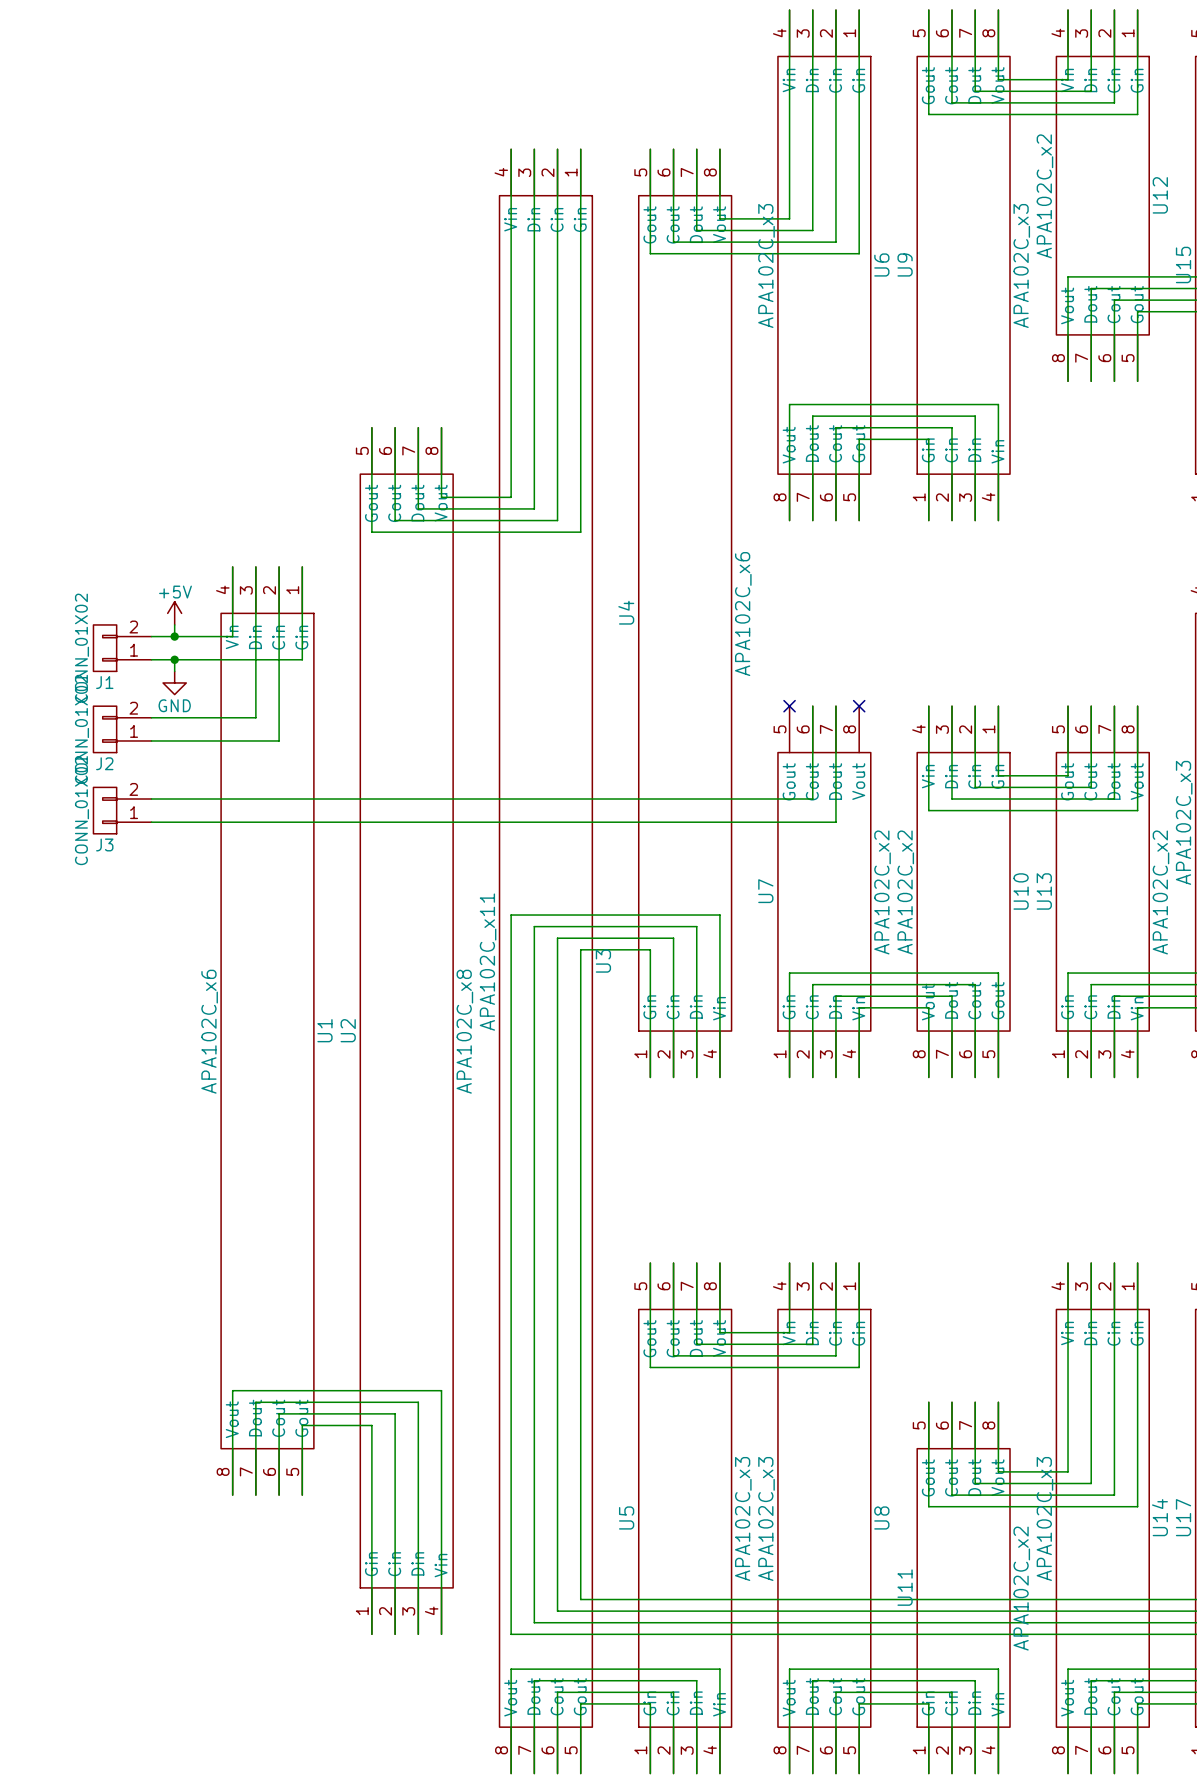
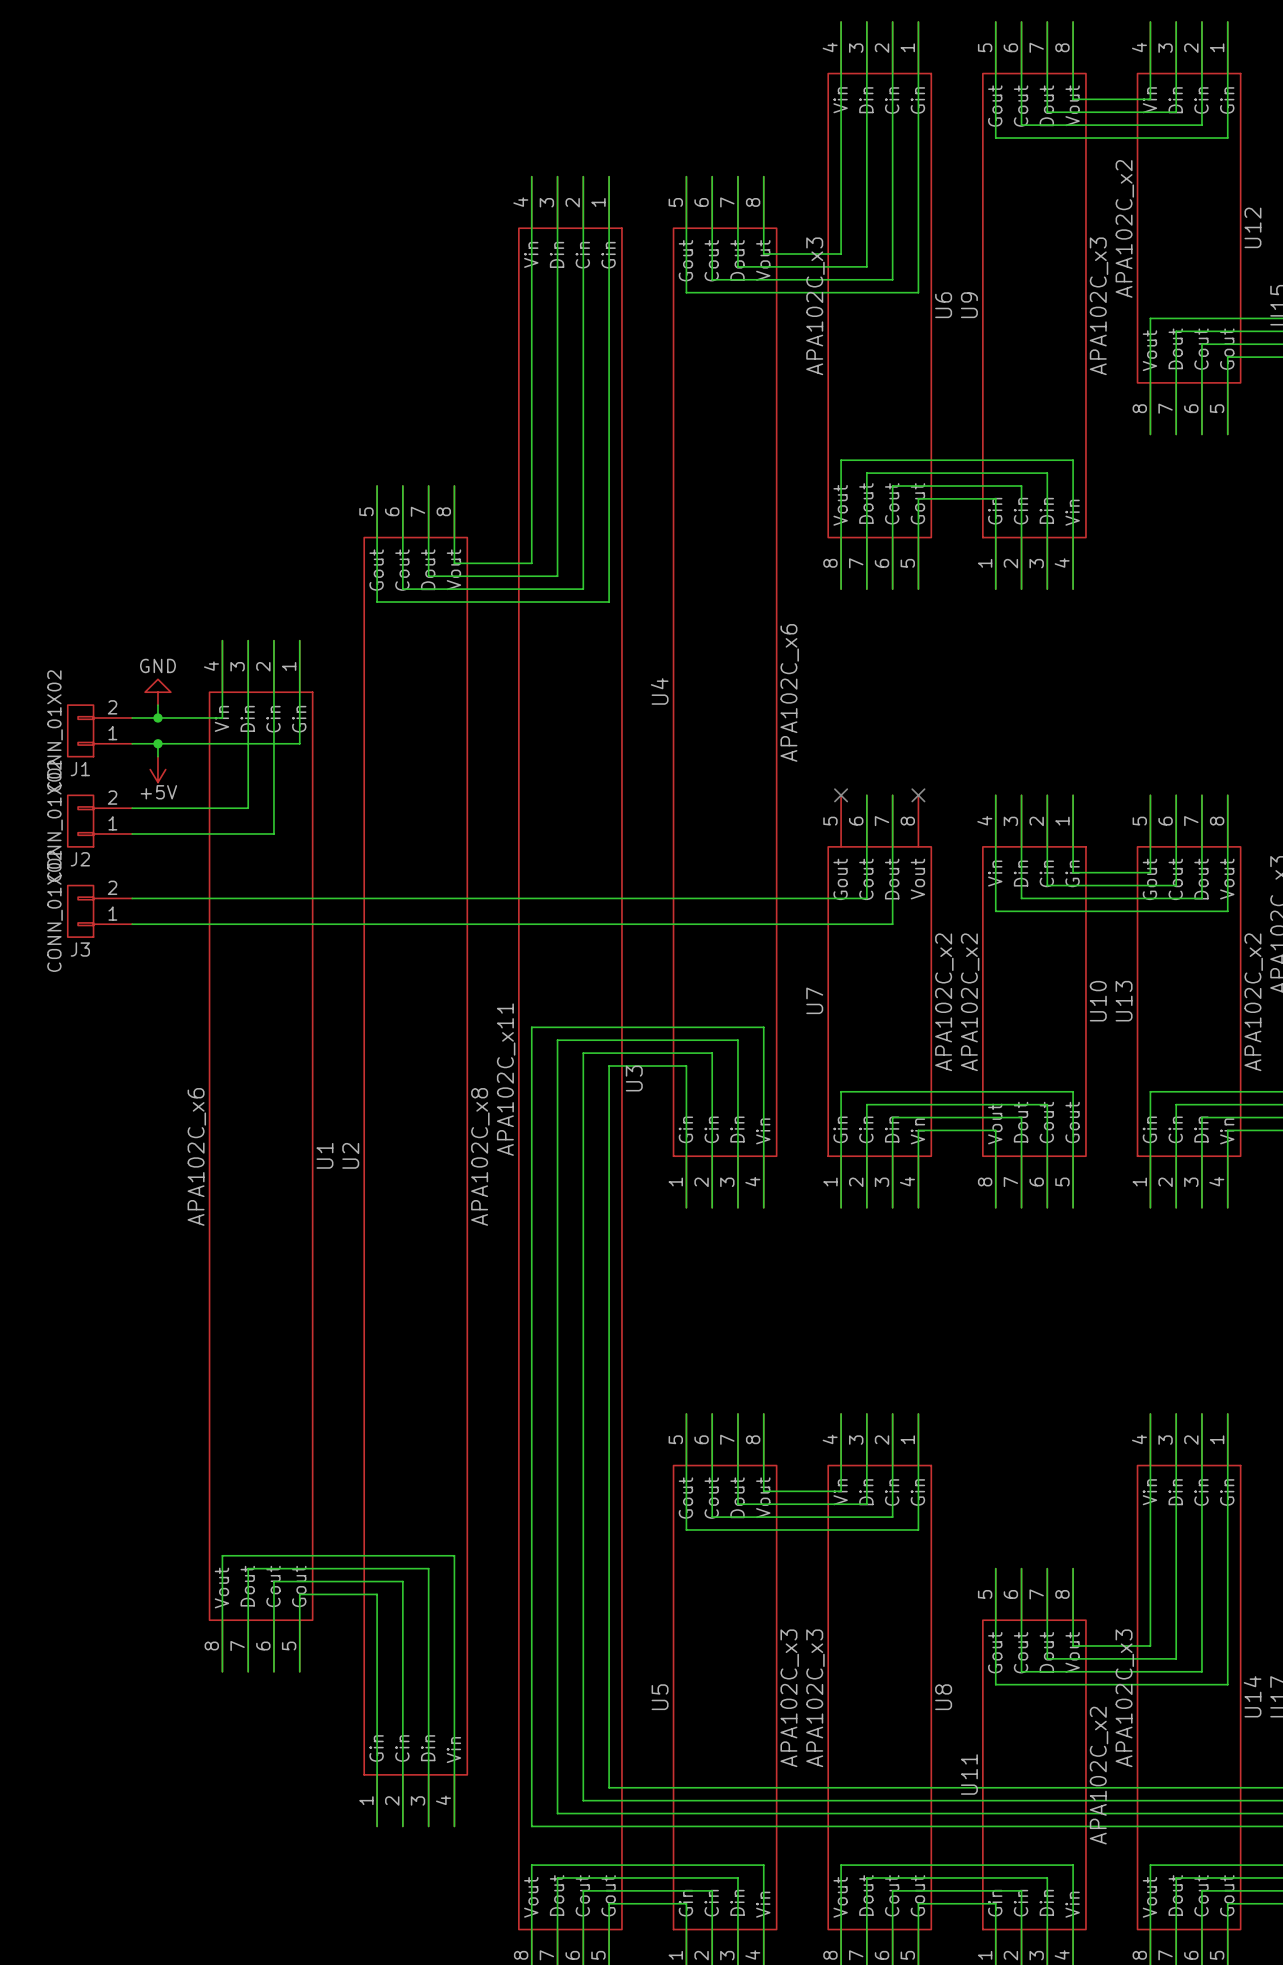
power symbol: +5V (174, 613) -> GND (157, 692)
power symbol: GND (174, 682) -> +5V (157, 769)

